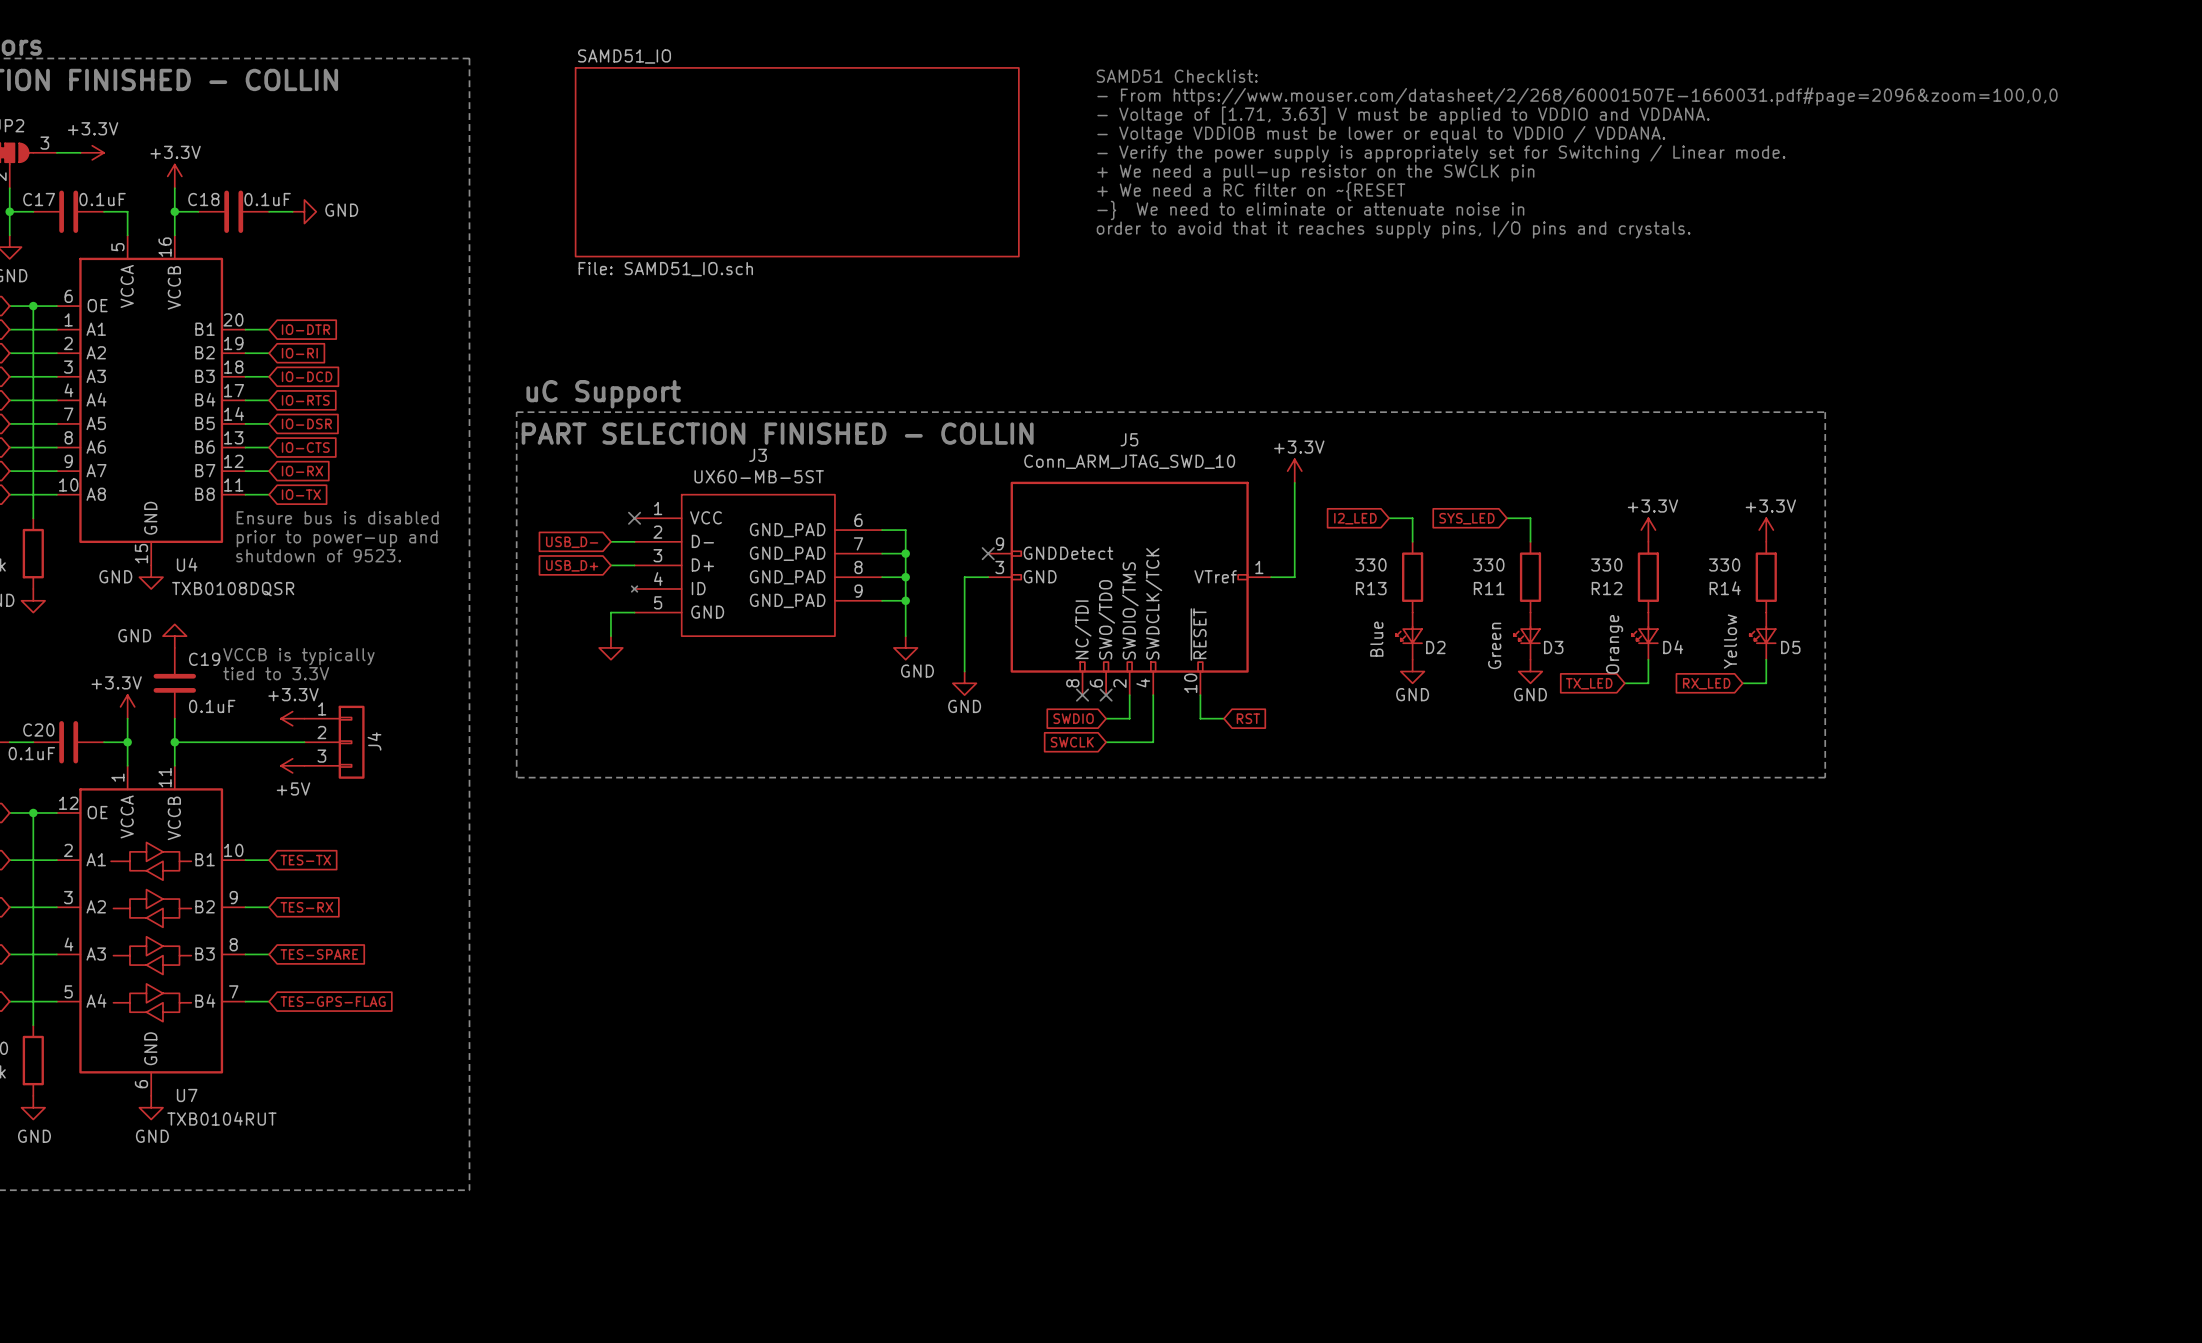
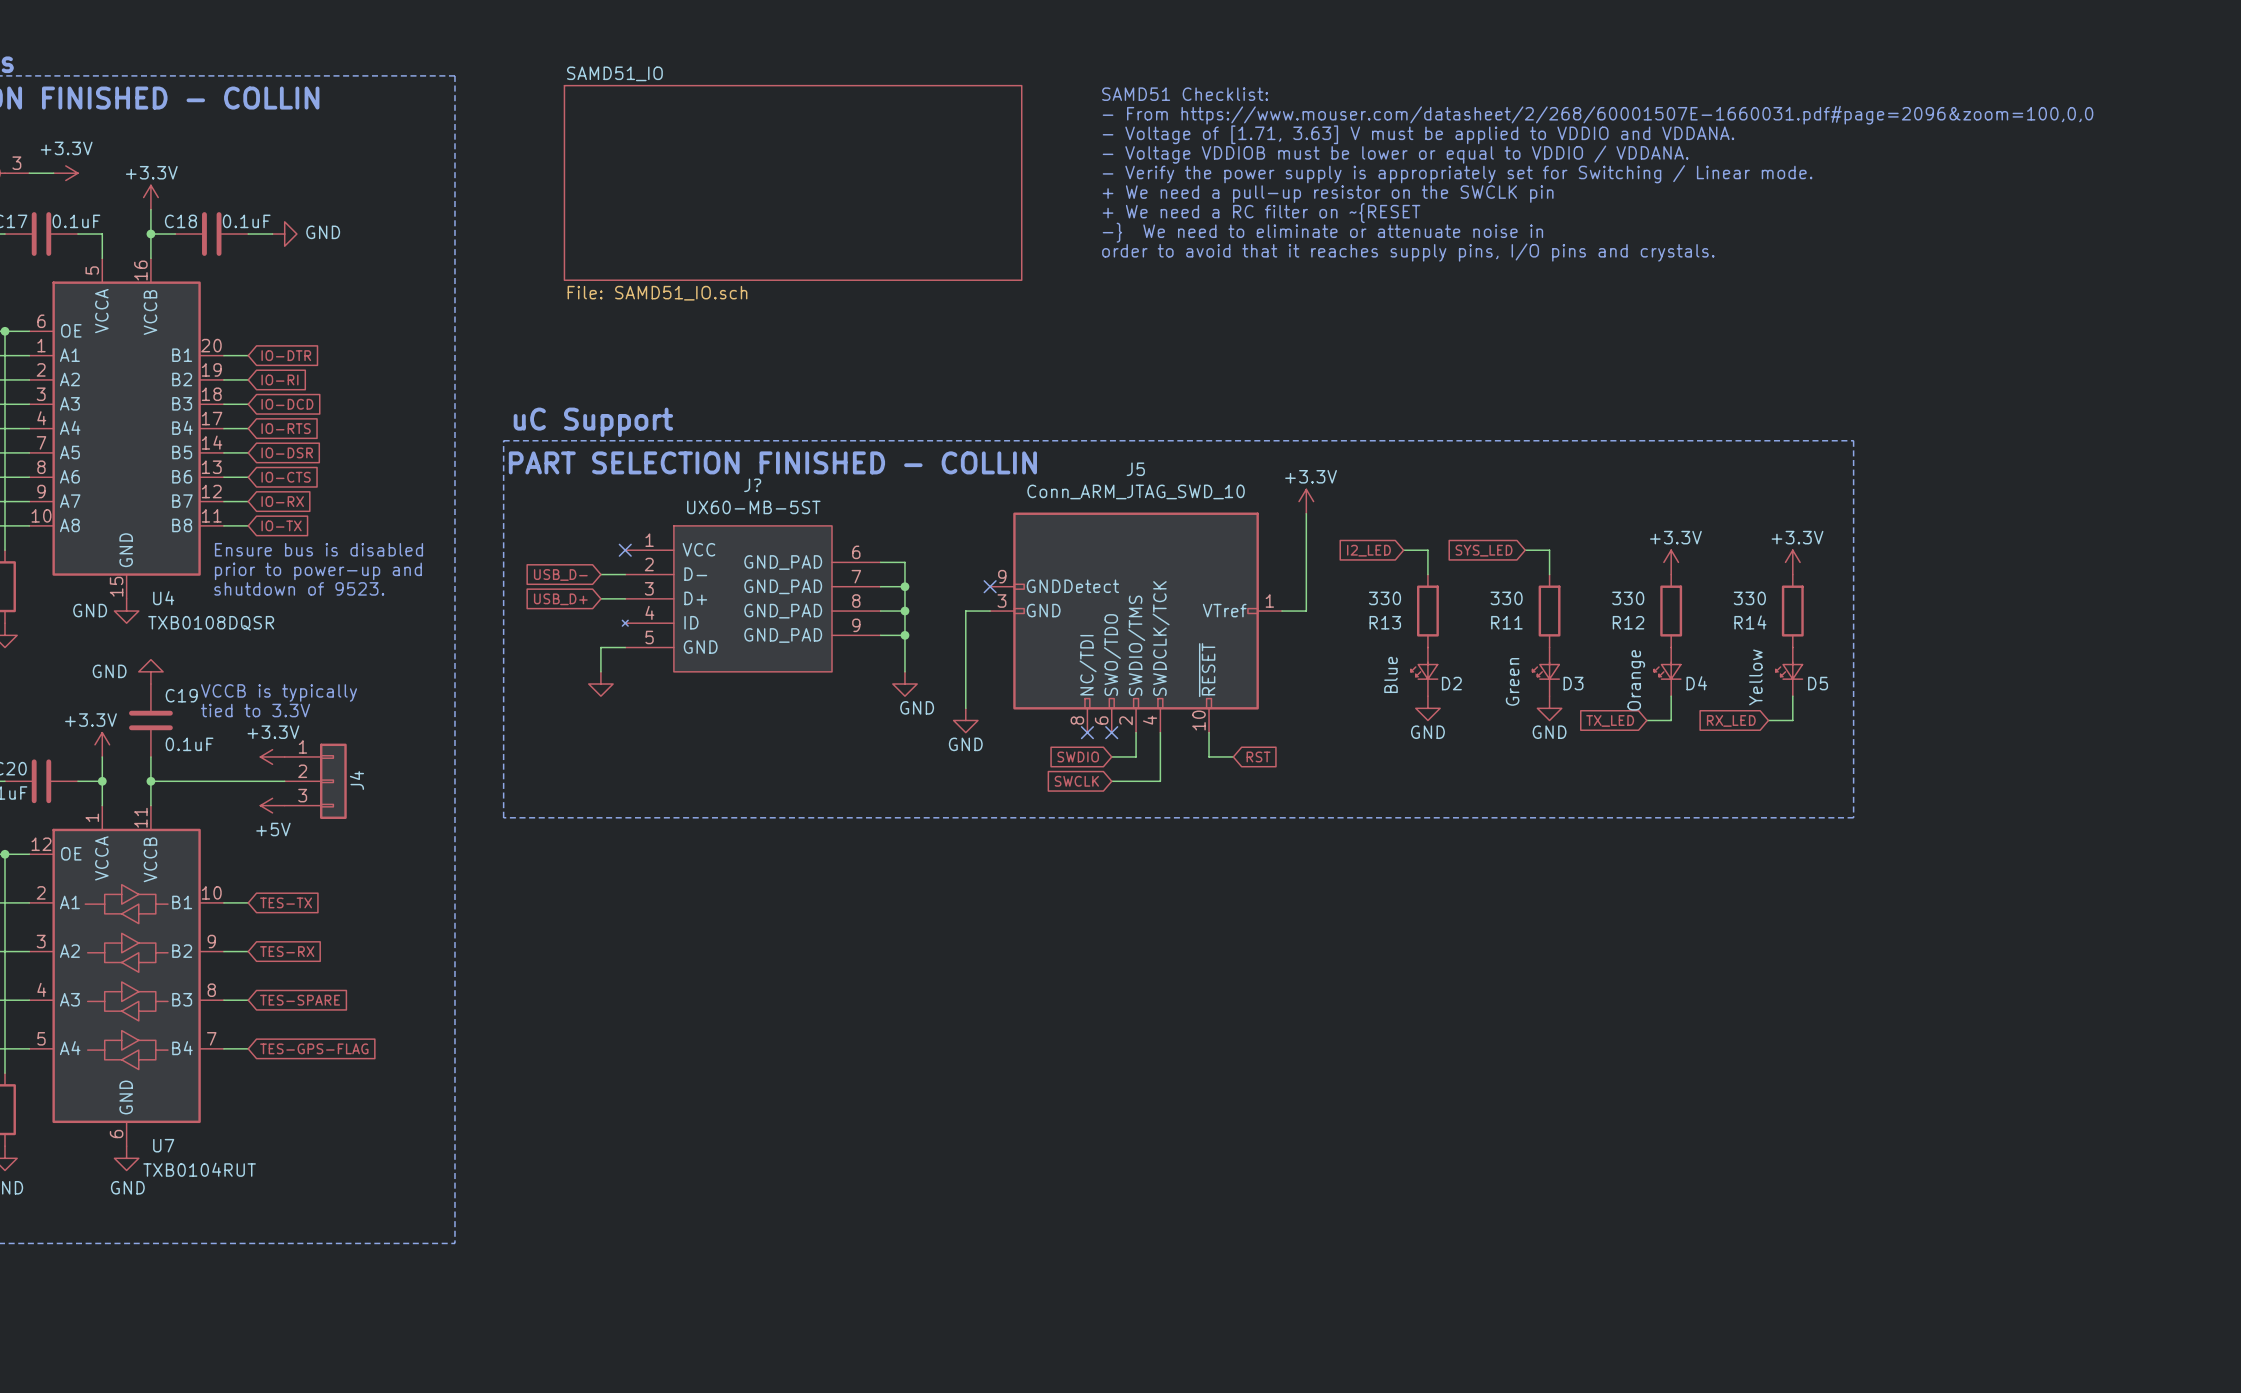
J3 name: J3 (758, 455) -> J? (752, 485)

